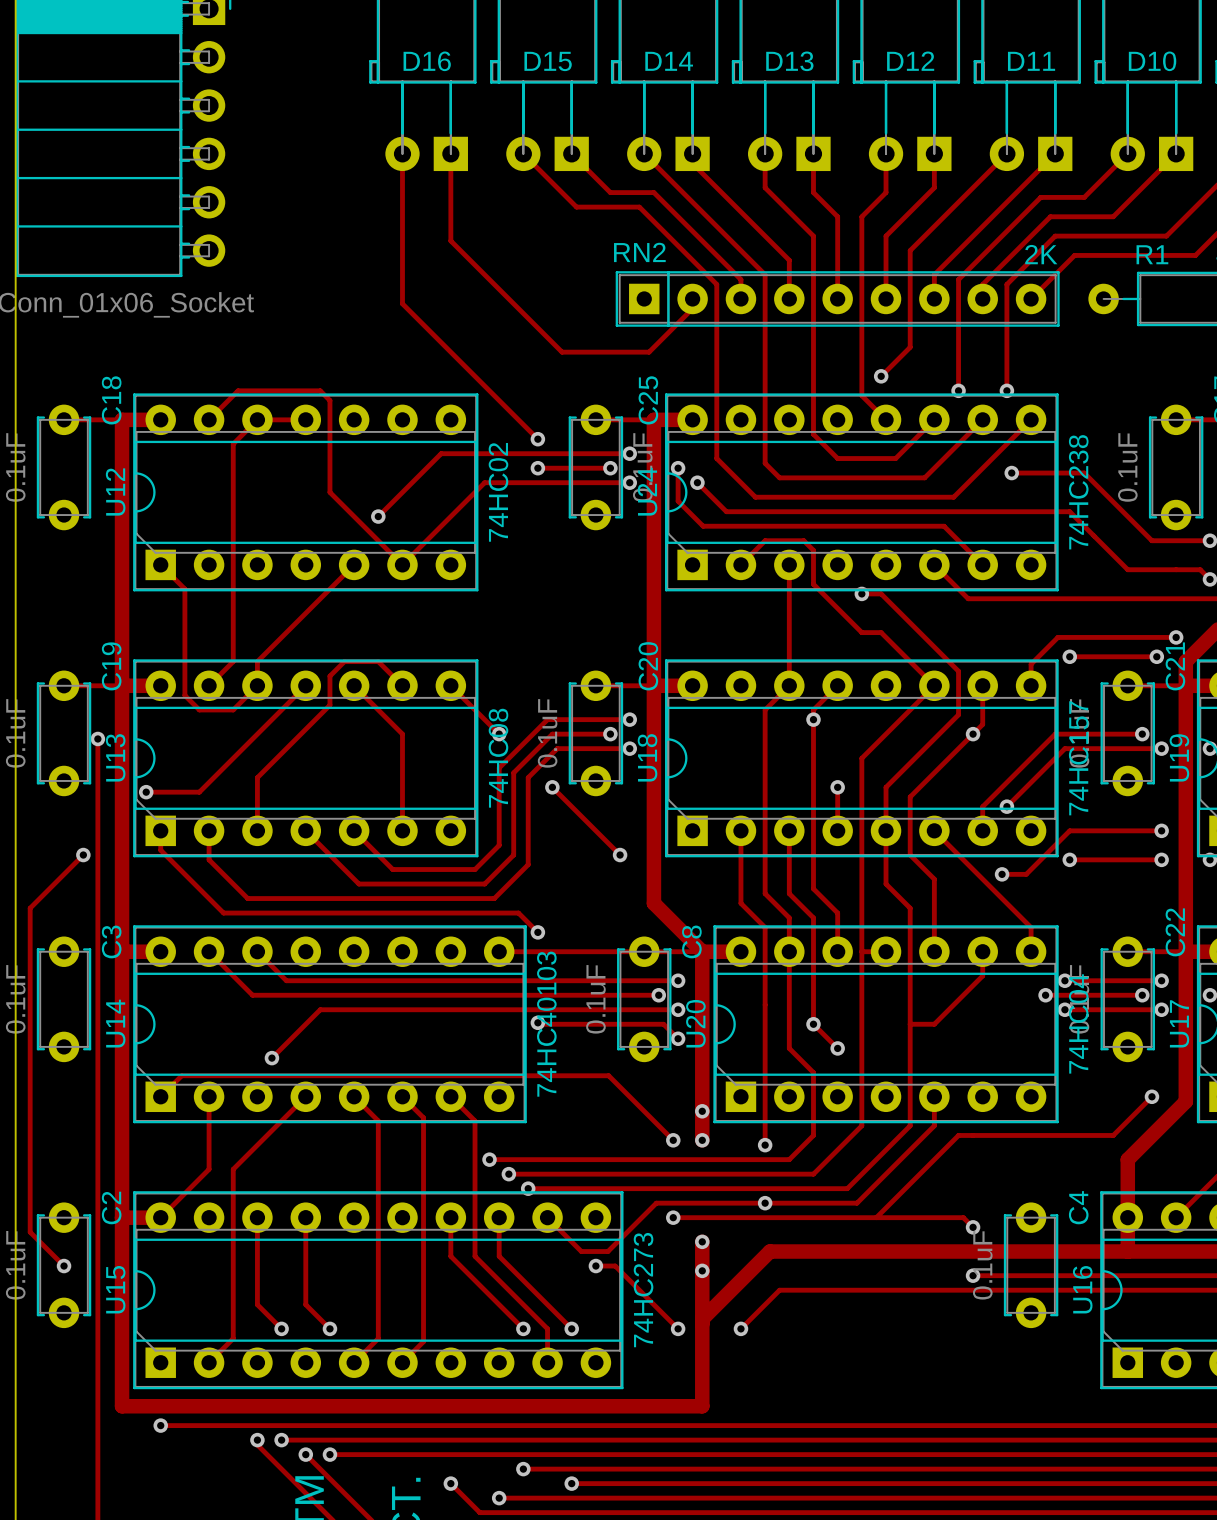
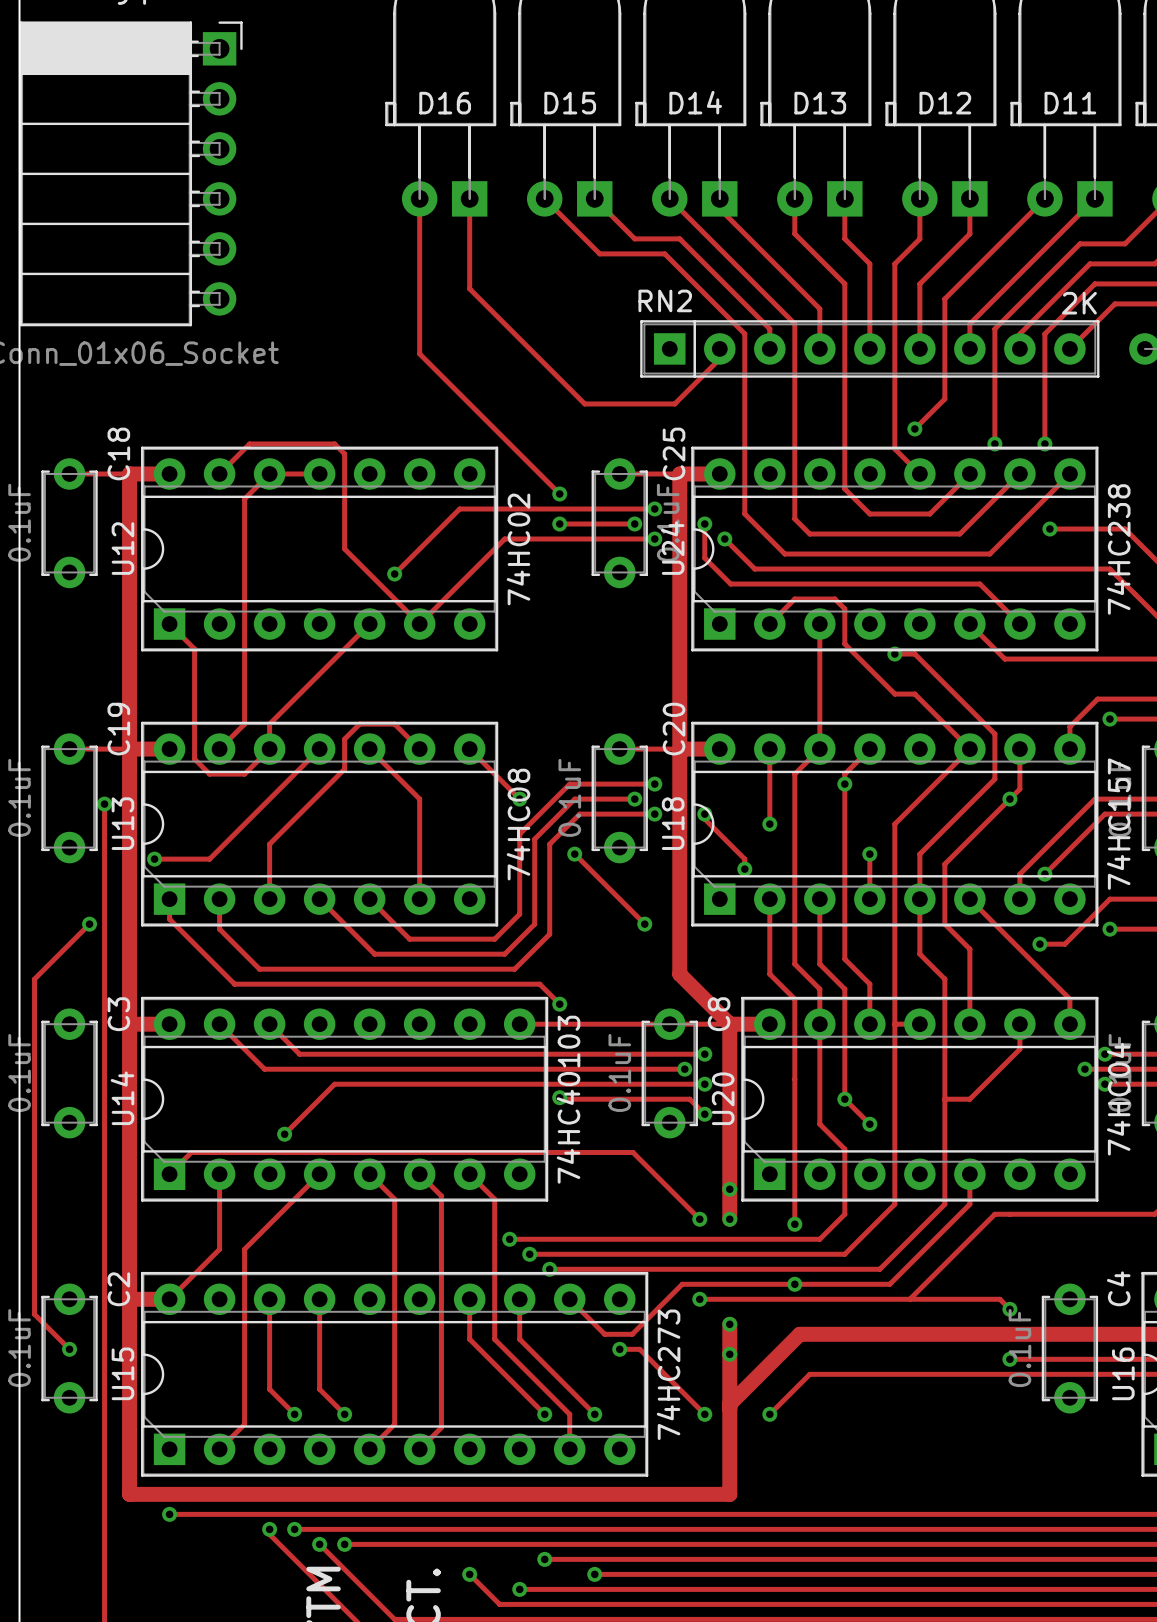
track: none -> (769, 749) (769, 824)
track: none -> (704, 814) (704, 819) (744, 859) (744, 869)
via: none -> (704, 814)
via: none -> (769, 824)
via: none -> (744, 869)

